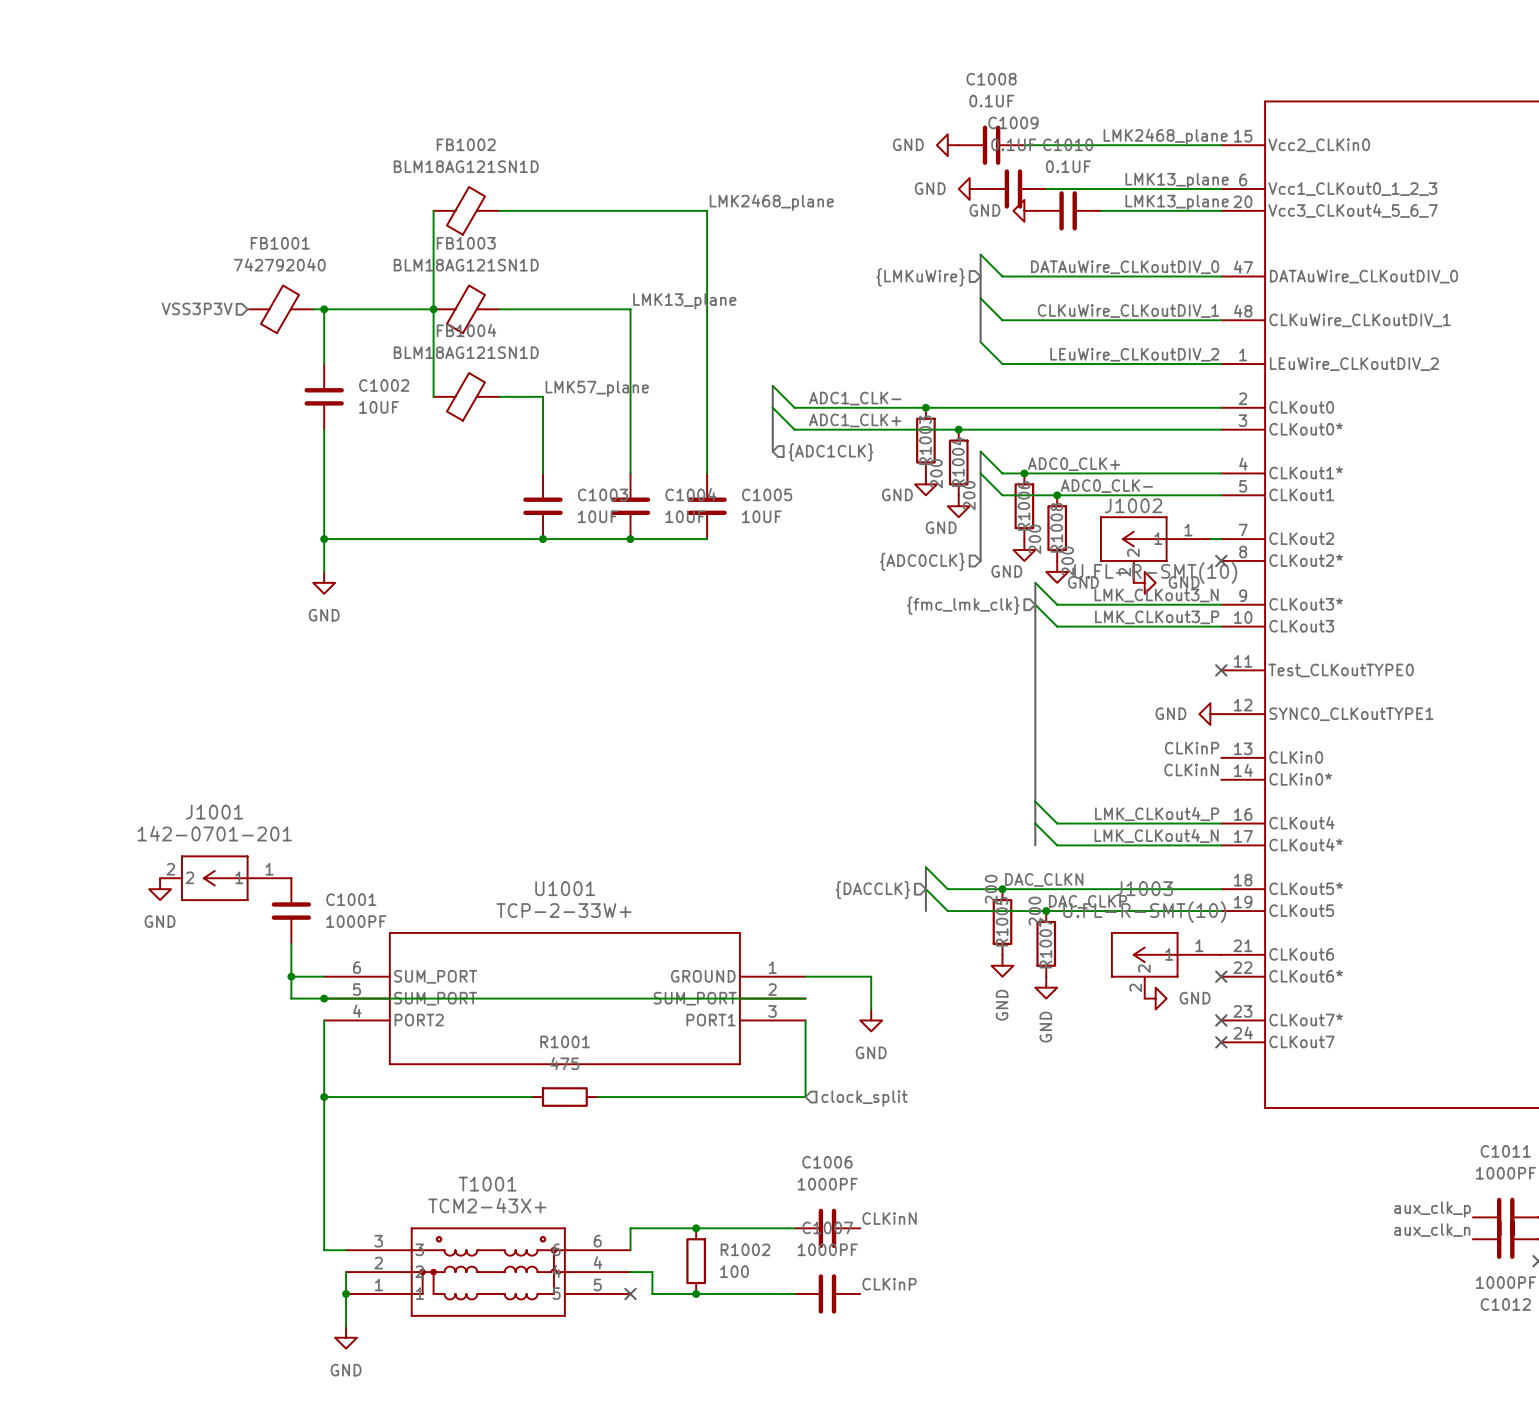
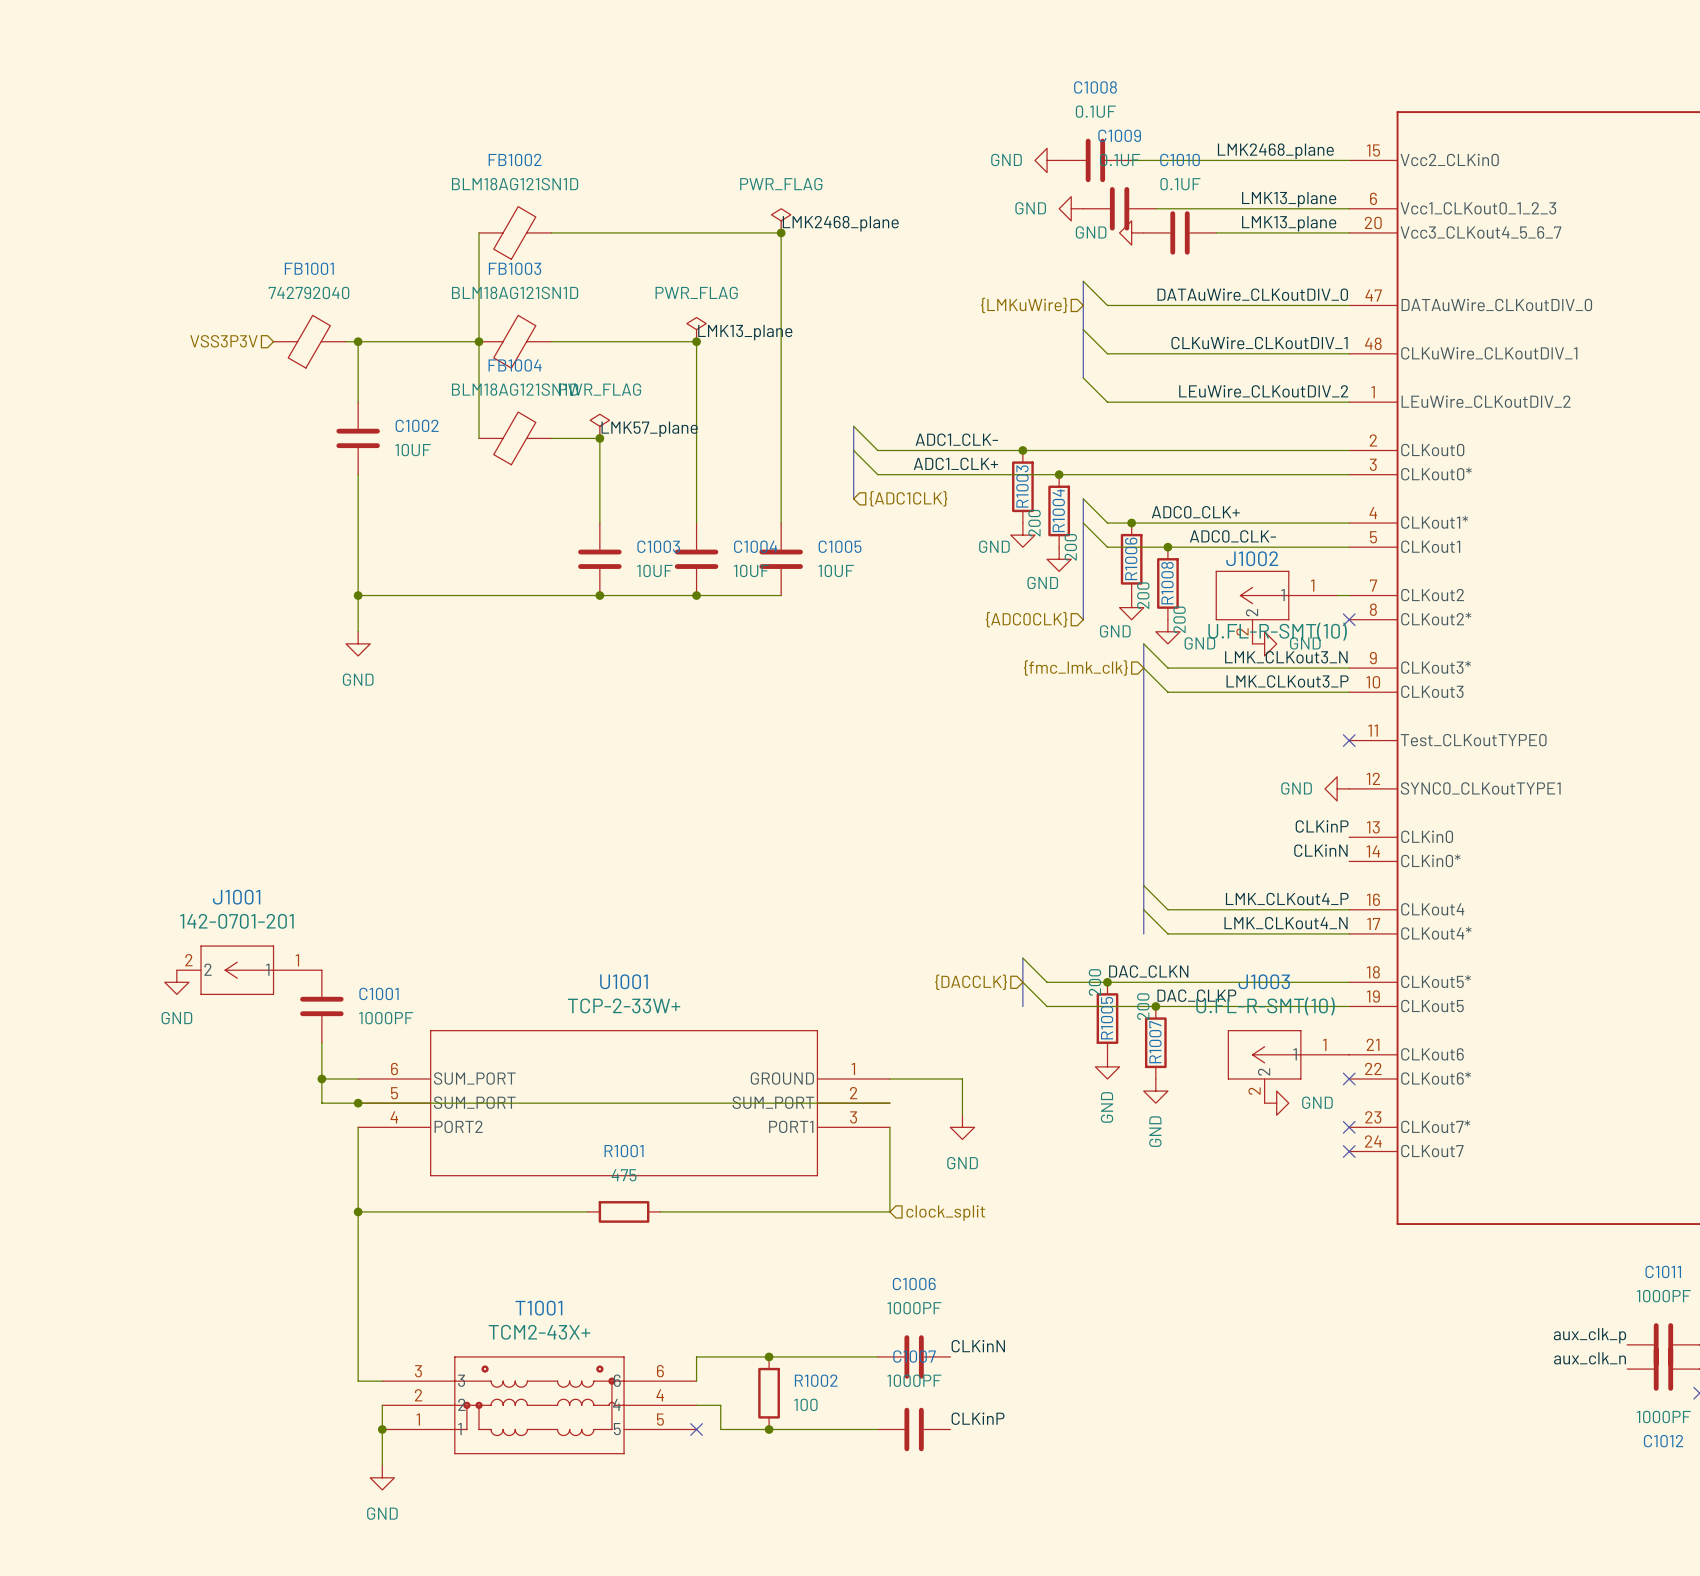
power symbol: none -> PWR_FLAG (781, 220)
junction: none -> (781, 232)
power symbol: none -> PWR_FLAG (696, 329)
junction: none -> (696, 341)
power symbol: none -> PWR_FLAG (599, 426)
junction: none -> (599, 438)

